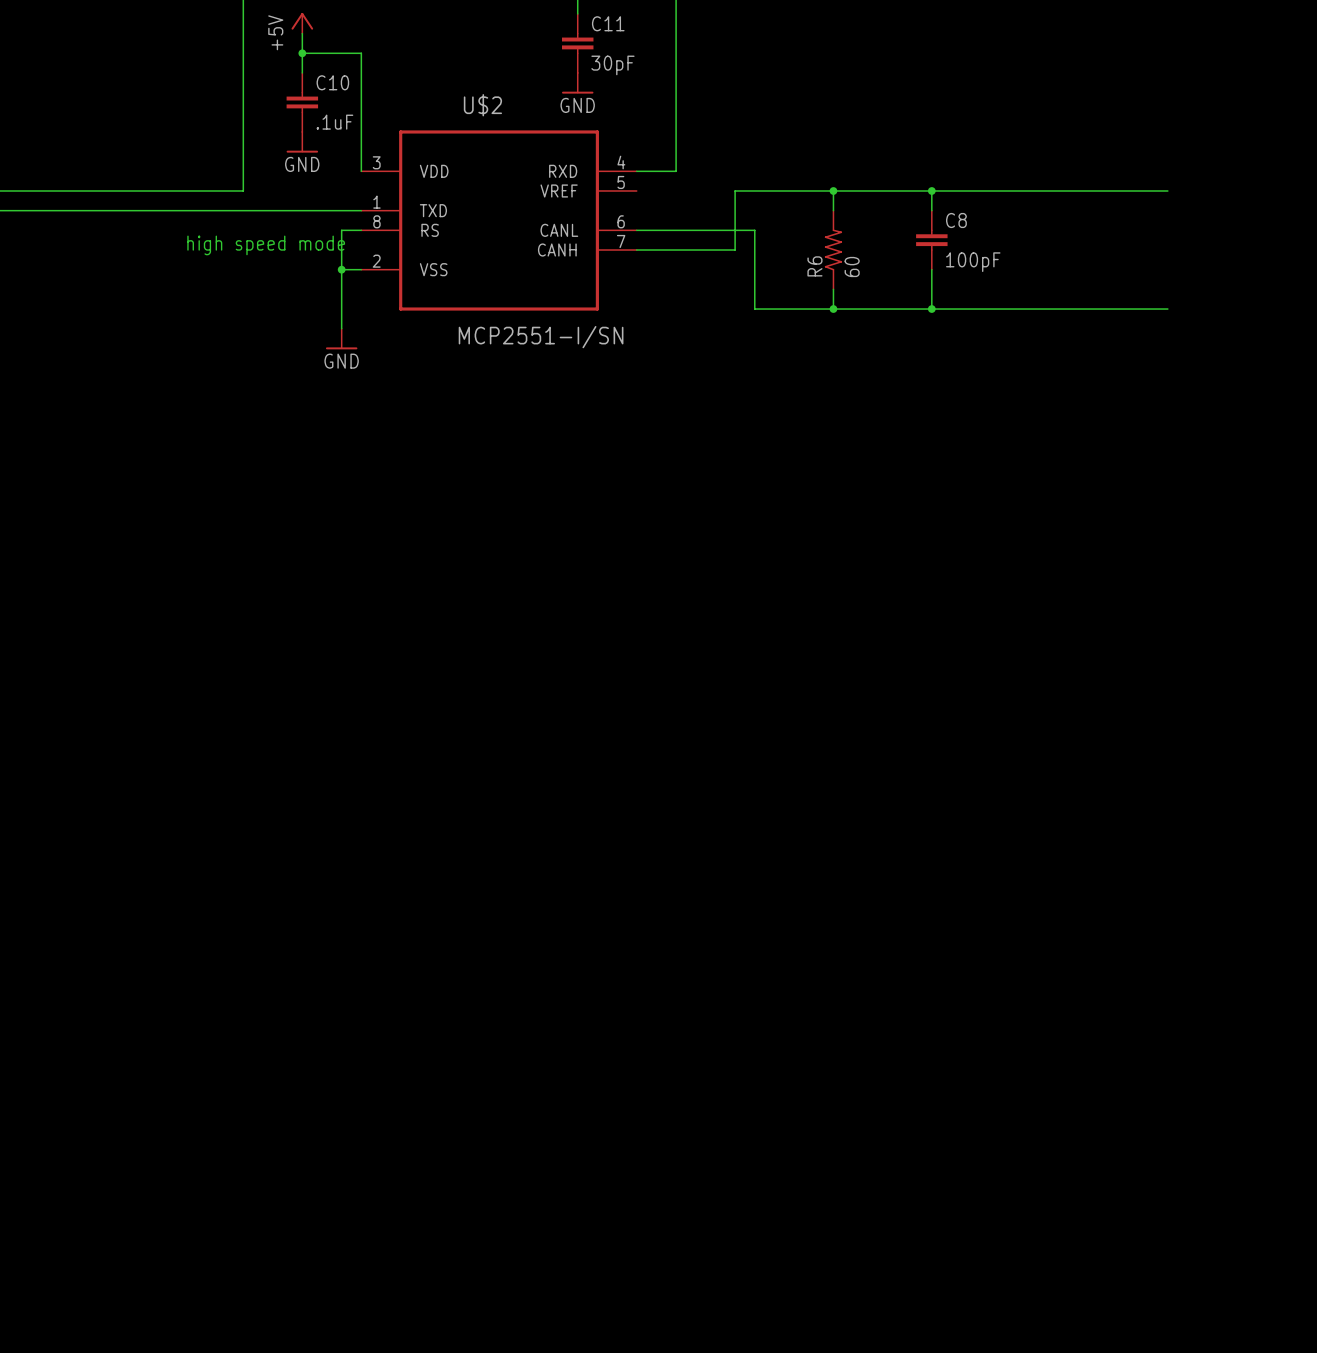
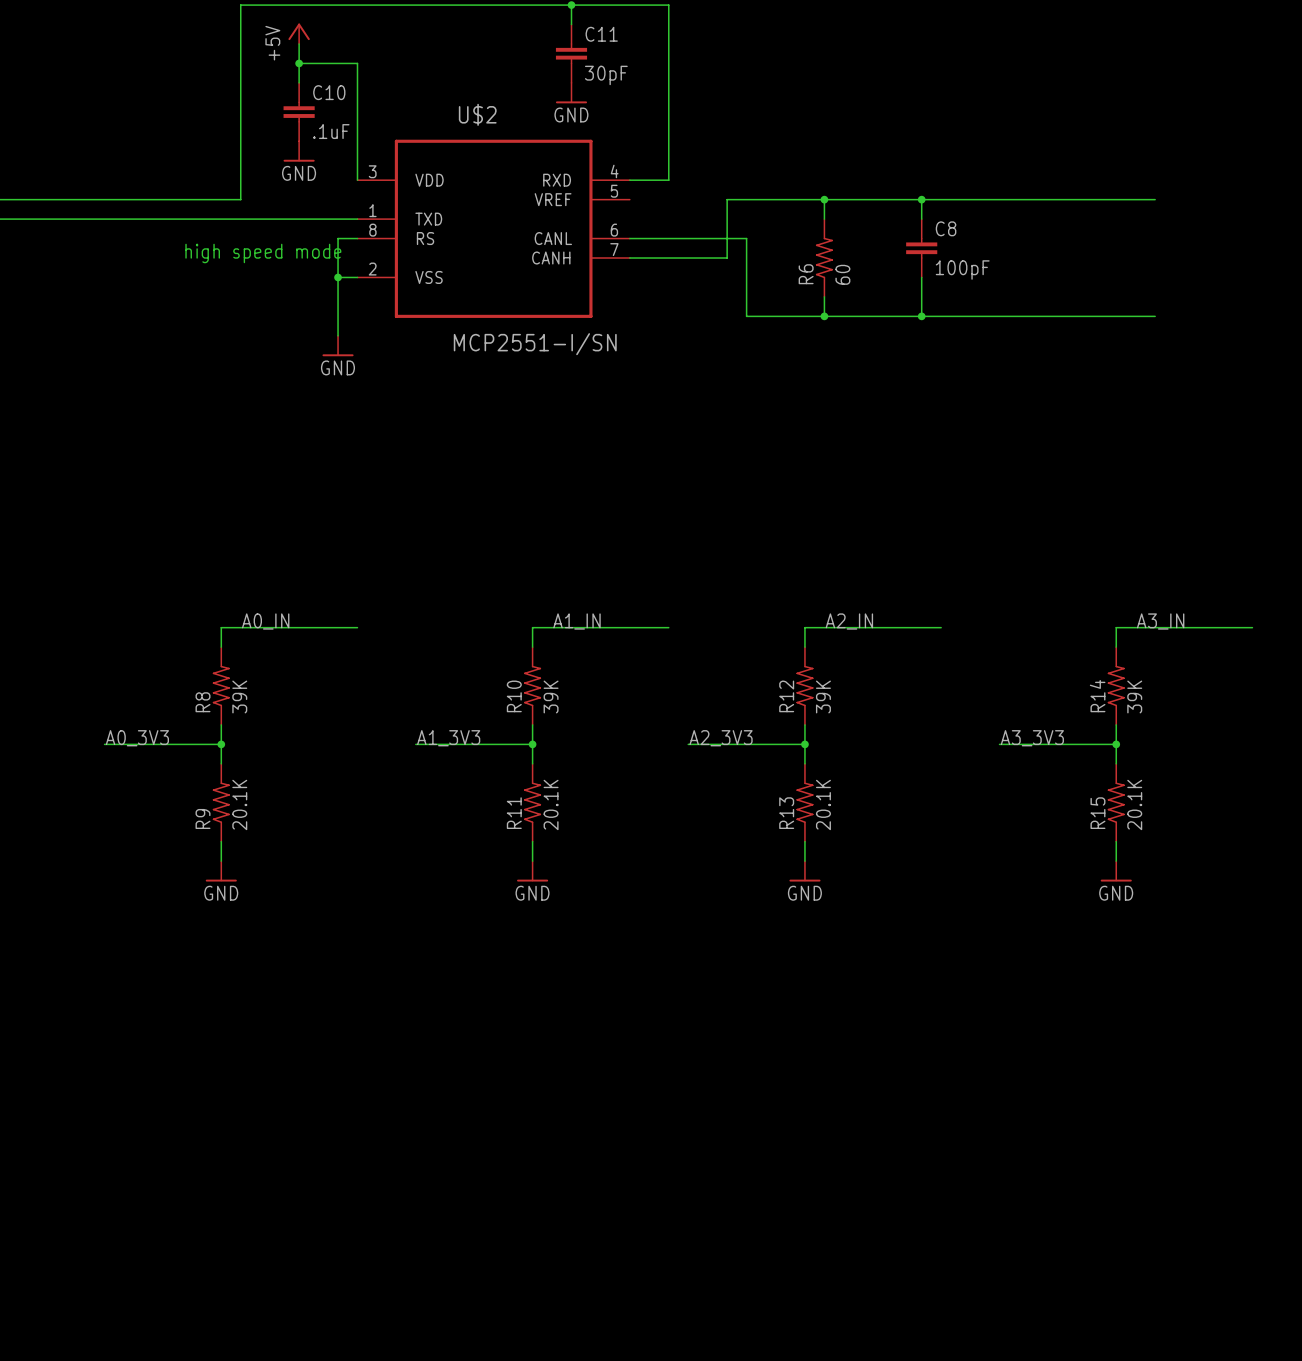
label: none -> A0_IN (265, 621)
label: none -> A1_IN (576, 621)
label: none -> A2_IN (849, 621)
label: none -> A3_IN (1160, 621)
wire: none -> (357, 627) (221, 627) (221, 647)
wire: none -> (668, 627) (532, 627) (532, 647)
wire: none -> (941, 627) (804, 627) (804, 647)
wire: none -> (1252, 627) (1116, 627) (1116, 647)
R8: none -> 39K (221, 686)
R10: none -> 39K (532, 686)
R12: none -> 39K (804, 686)
R14: none -> 39K (1116, 686)
wire: none -> (221, 724) (221, 763)
wire: none -> (532, 724) (532, 763)
wire: none -> (804, 724) (804, 763)
wire: none -> (1116, 724) (1116, 763)
label: none -> A0_3V3 (137, 738)
label: none -> A1_3V3 (448, 738)
label: none -> A2_3V3 (721, 738)
label: none -> A3_3V3 (1032, 738)
wire: none -> (104, 744) (221, 744)
junction: none -> (221, 744)
wire: none -> (415, 744) (532, 744)
junction: none -> (532, 744)
wire: none -> (688, 744) (804, 744)
junction: none -> (804, 744)
wire: none -> (999, 744) (1116, 744)
junction: none -> (1116, 744)
R9: none -> 20.1K (221, 802)
R11: none -> 20.1K (532, 802)
R13: none -> 20.1K (804, 802)
R15: none -> 20.1K (1116, 802)
wire: none -> (221, 841) (221, 861)
wire: none -> (532, 841) (532, 861)
wire: none -> (804, 841) (804, 861)
wire: none -> (1116, 841) (1116, 861)
power symbol: none -> GND (221, 871)
power symbol: none -> GND (532, 871)
power symbol: none -> GND (804, 871)
power symbol: none -> GND (1116, 871)

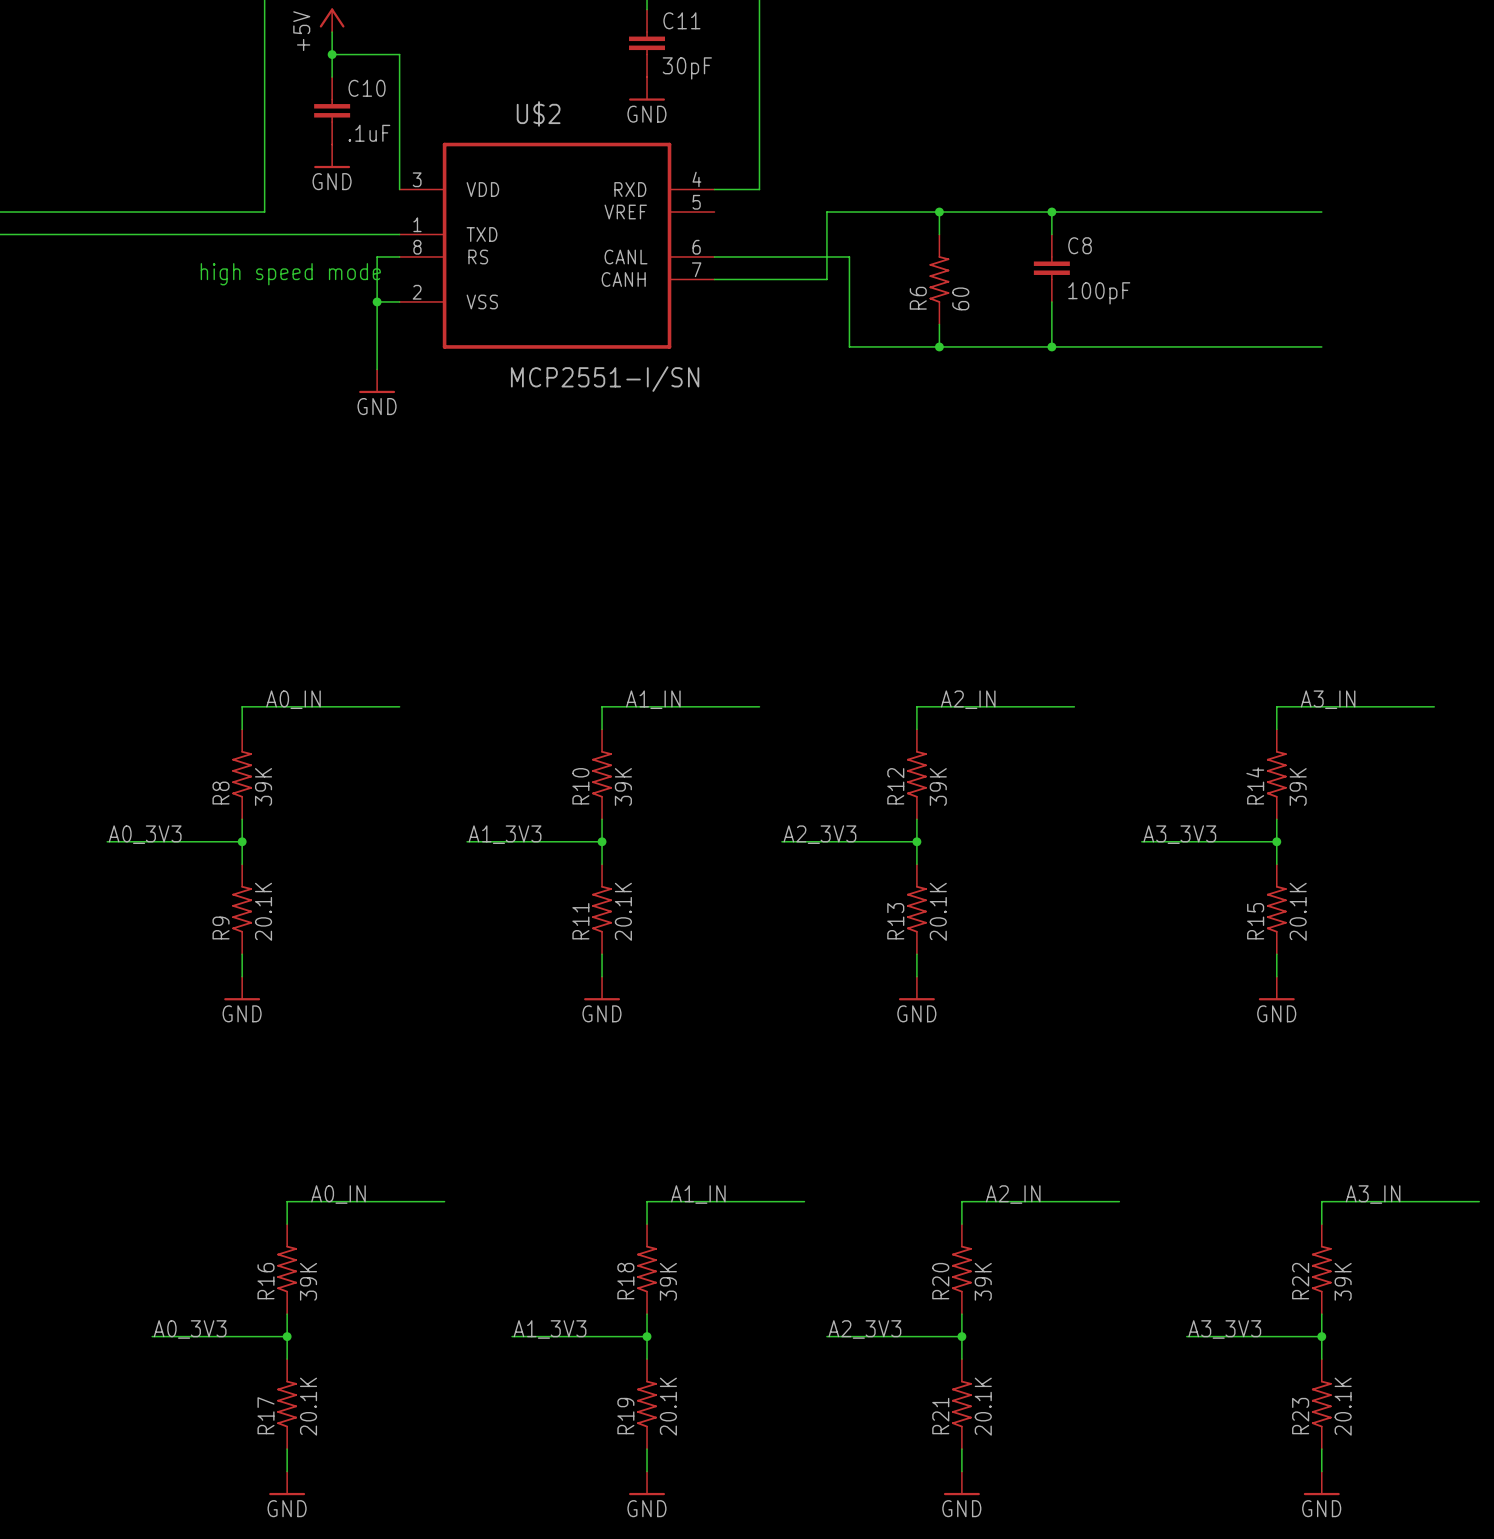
label: none -> A0_IN (338, 1194)
label: none -> A1_IN (698, 1194)
label: none -> A2_IN (1013, 1194)
label: none -> A3_IN (1373, 1194)
wire: none -> (444, 1201) (287, 1201) (287, 1224)
wire: none -> (804, 1201) (647, 1201) (647, 1224)
wire: none -> (1119, 1201) (961, 1201) (961, 1224)
wire: none -> (1479, 1201) (1321, 1201) (1321, 1224)
R16: none -> 39K (287, 1269)
R18: none -> 39K (647, 1269)
R20: none -> 39K (961, 1269)
R22: none -> 39K (1321, 1269)
wire: none -> (287, 1314) (287, 1359)
wire: none -> (647, 1314) (647, 1359)
wire: none -> (961, 1314) (961, 1359)
wire: none -> (1321, 1314) (1321, 1359)
label: none -> A0_3V3 (190, 1329)
label: none -> A1_3V3 (550, 1329)
label: none -> A2_3V3 (864, 1329)
label: none -> A3_3V3 (1224, 1329)
wire: none -> (152, 1336) (287, 1336)
junction: none -> (287, 1336)
wire: none -> (512, 1336) (647, 1336)
junction: none -> (647, 1336)
wire: none -> (826, 1336) (961, 1336)
junction: none -> (961, 1336)
wire: none -> (1186, 1336) (1321, 1336)
junction: none -> (1321, 1336)
R17: none -> 20.1K (287, 1404)
R19: none -> 20.1K (647, 1404)
R21: none -> 20.1K (961, 1404)
R23: none -> 20.1K (1321, 1404)
wire: none -> (287, 1449) (287, 1471)
wire: none -> (647, 1449) (647, 1471)
wire: none -> (961, 1449) (961, 1471)
wire: none -> (1321, 1449) (1321, 1471)
power symbol: none -> GND (287, 1483)
power symbol: none -> GND (647, 1483)
power symbol: none -> GND (961, 1483)
power symbol: none -> GND (1321, 1483)

